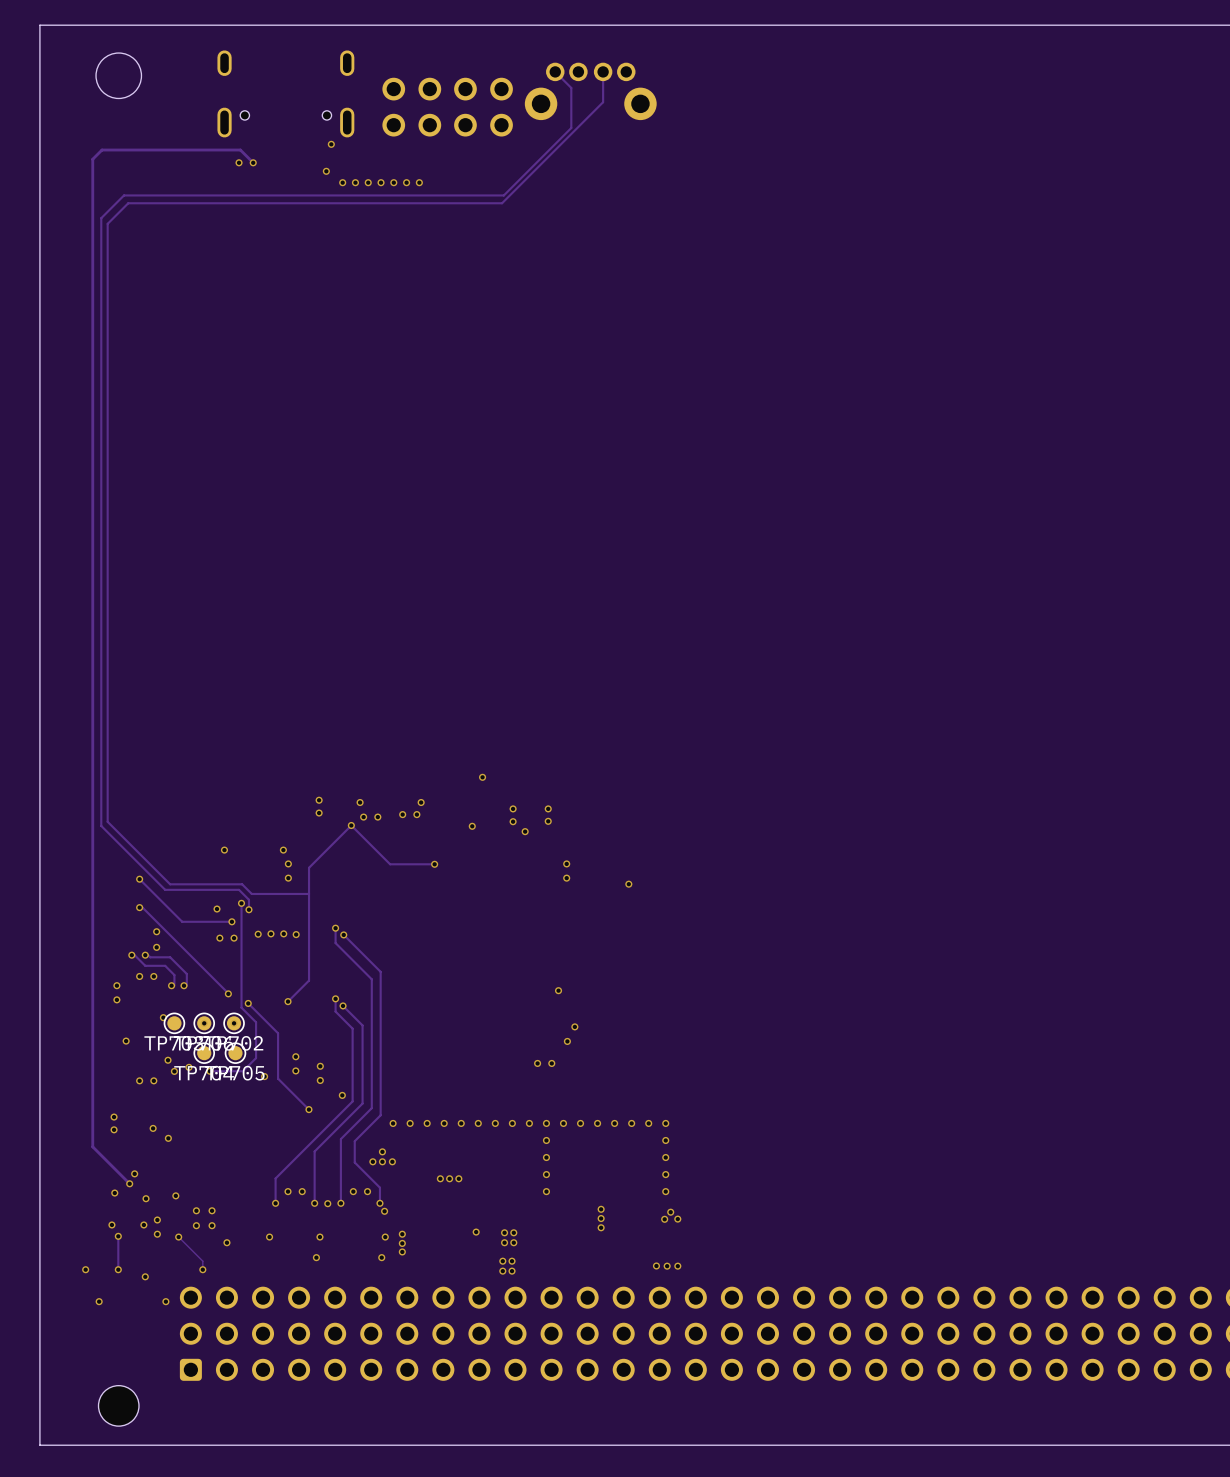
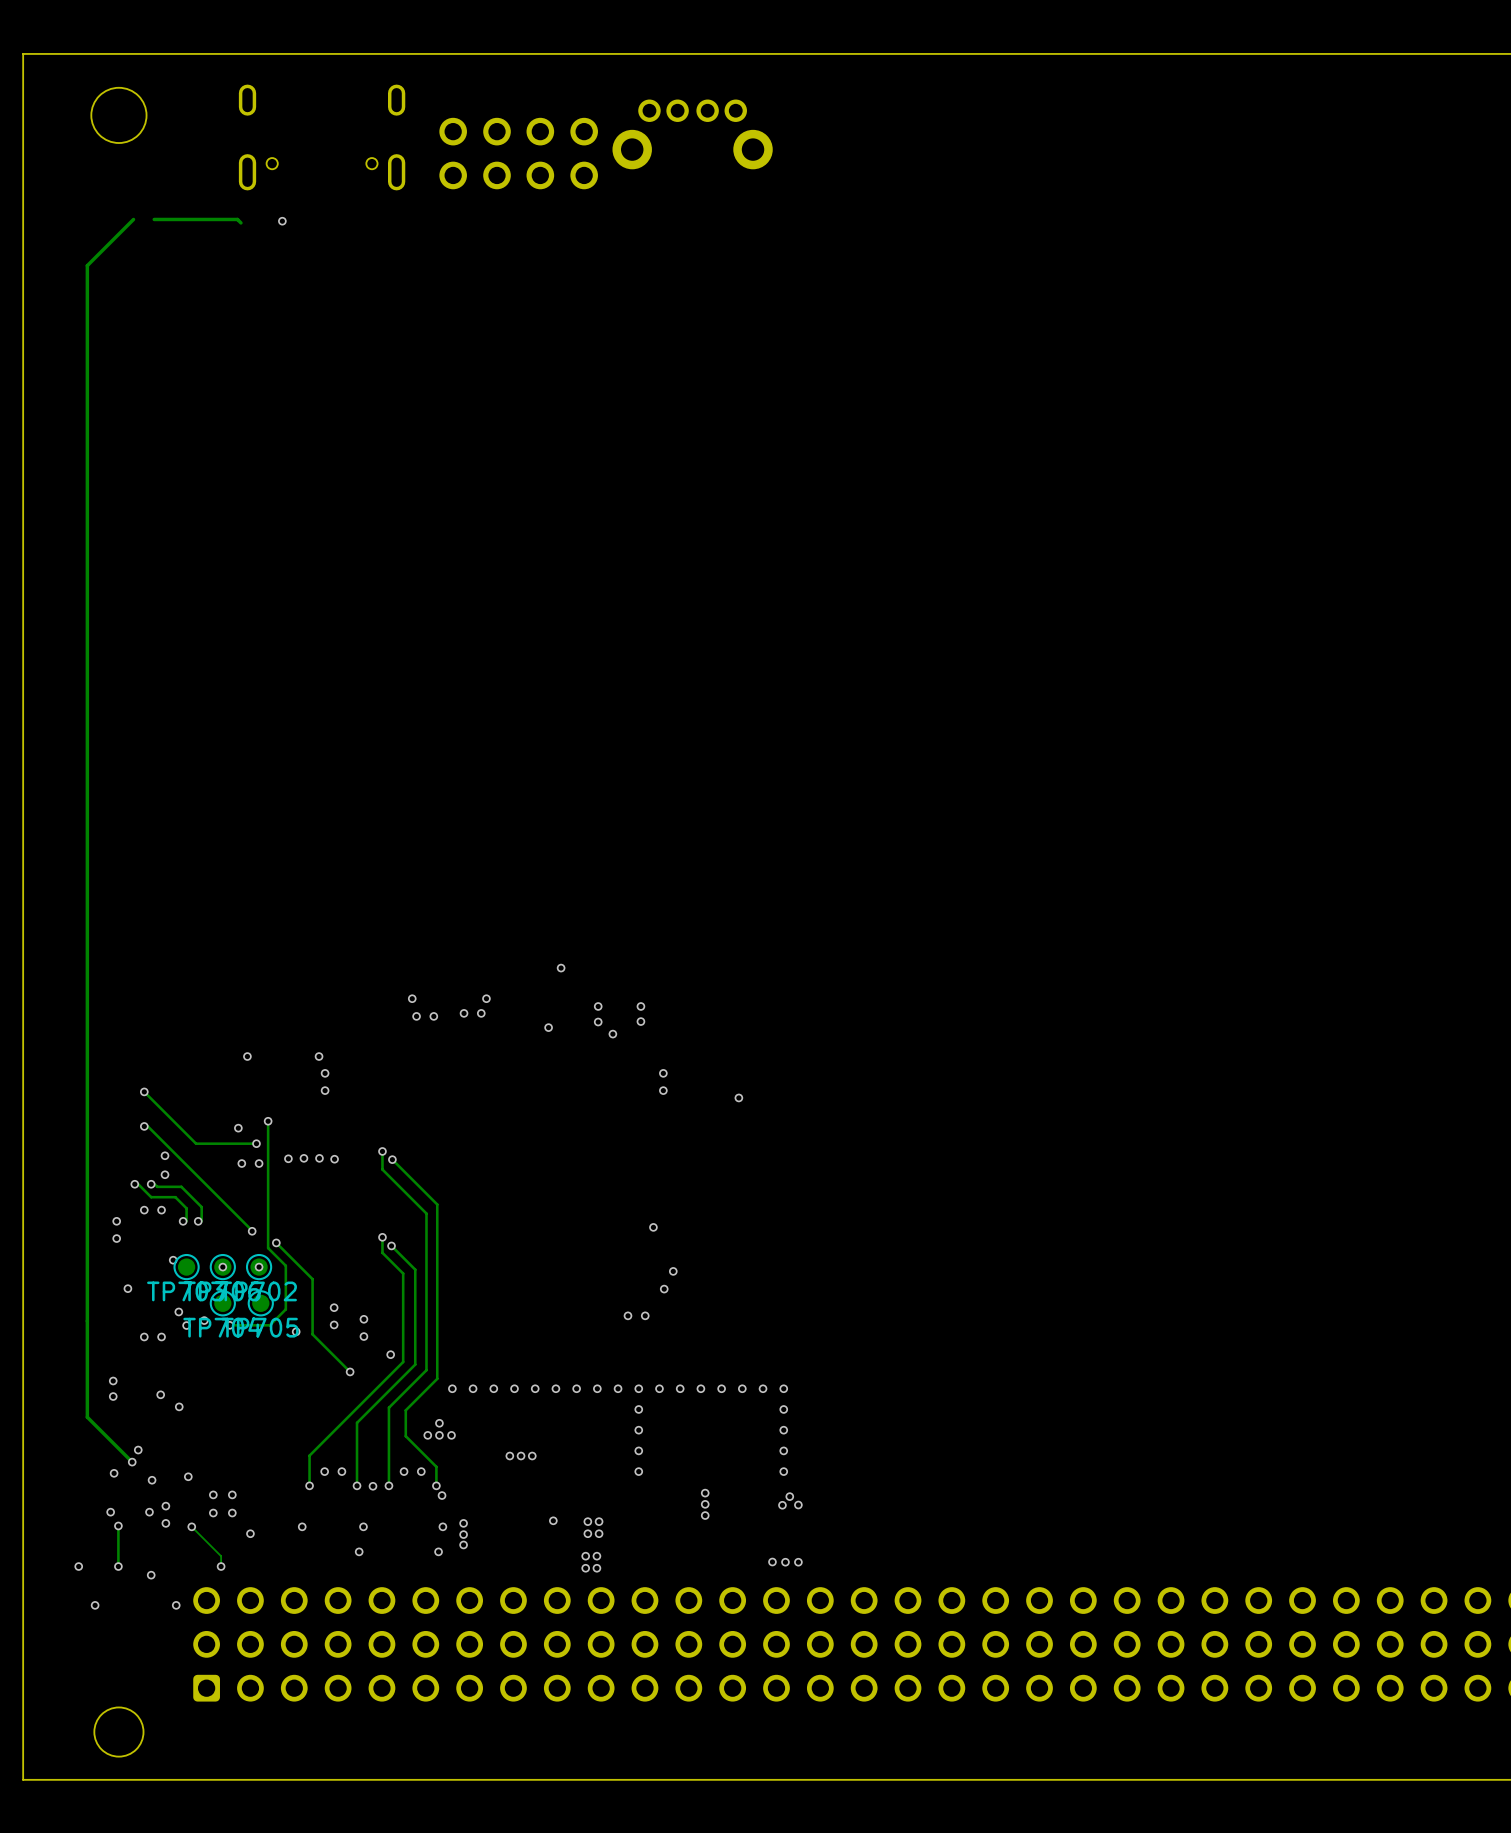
track: (555, 71) (571, 87) (571, 128) (503, 195) (124, 195) (101, 218) (101, 825) (165, 889) (239, 889) (248, 899) (248, 909) -> none
track: (603, 71) (603, 102) (502, 203) (128, 203) (107, 223) (107, 821) (170, 884) (242, 884) (251, 893) (309, 893) -> none
via: (331, 144) -> none
track: none -> (154, 219) (237, 219) (240, 222)
via: (239, 162) -> none
track: (253, 162) (240, 150) (101, 150) (92, 159) (92, 199) -> (133, 219) (87, 265)
via: (326, 171) -> none
via: (342, 182) -> none
via: (355, 182) -> none
via: (368, 182) -> none
via: (381, 182) -> none
via: (393, 182) -> none
via: (406, 182) -> none
via: (419, 182) -> none
via: (319, 800) -> none
via: (319, 813) -> none
via: (351, 825) -> none
track: (434, 864) (390, 864) (351, 825) (309, 867) (309, 980) (288, 1001) -> none
via: (434, 864) -> none
via: (248, 909) -> none
via: (288, 1001) -> none

